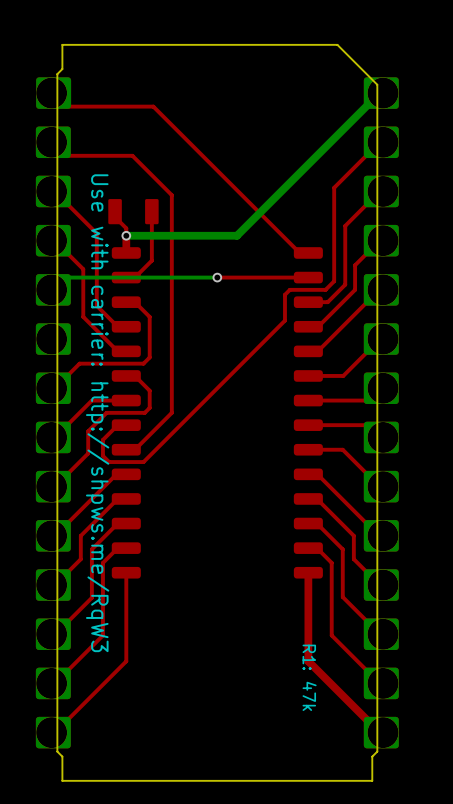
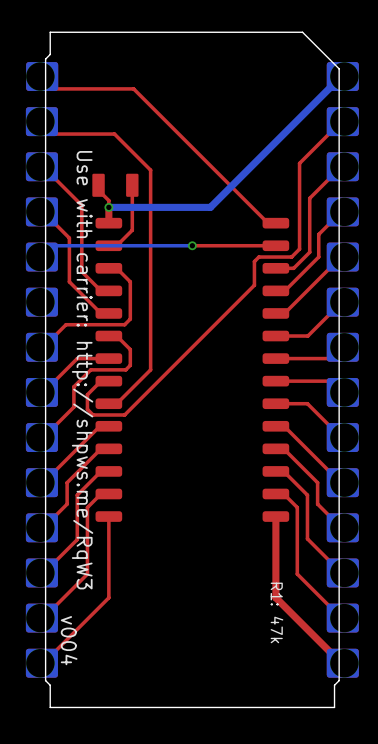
text: none -> v004 (69, 640)

